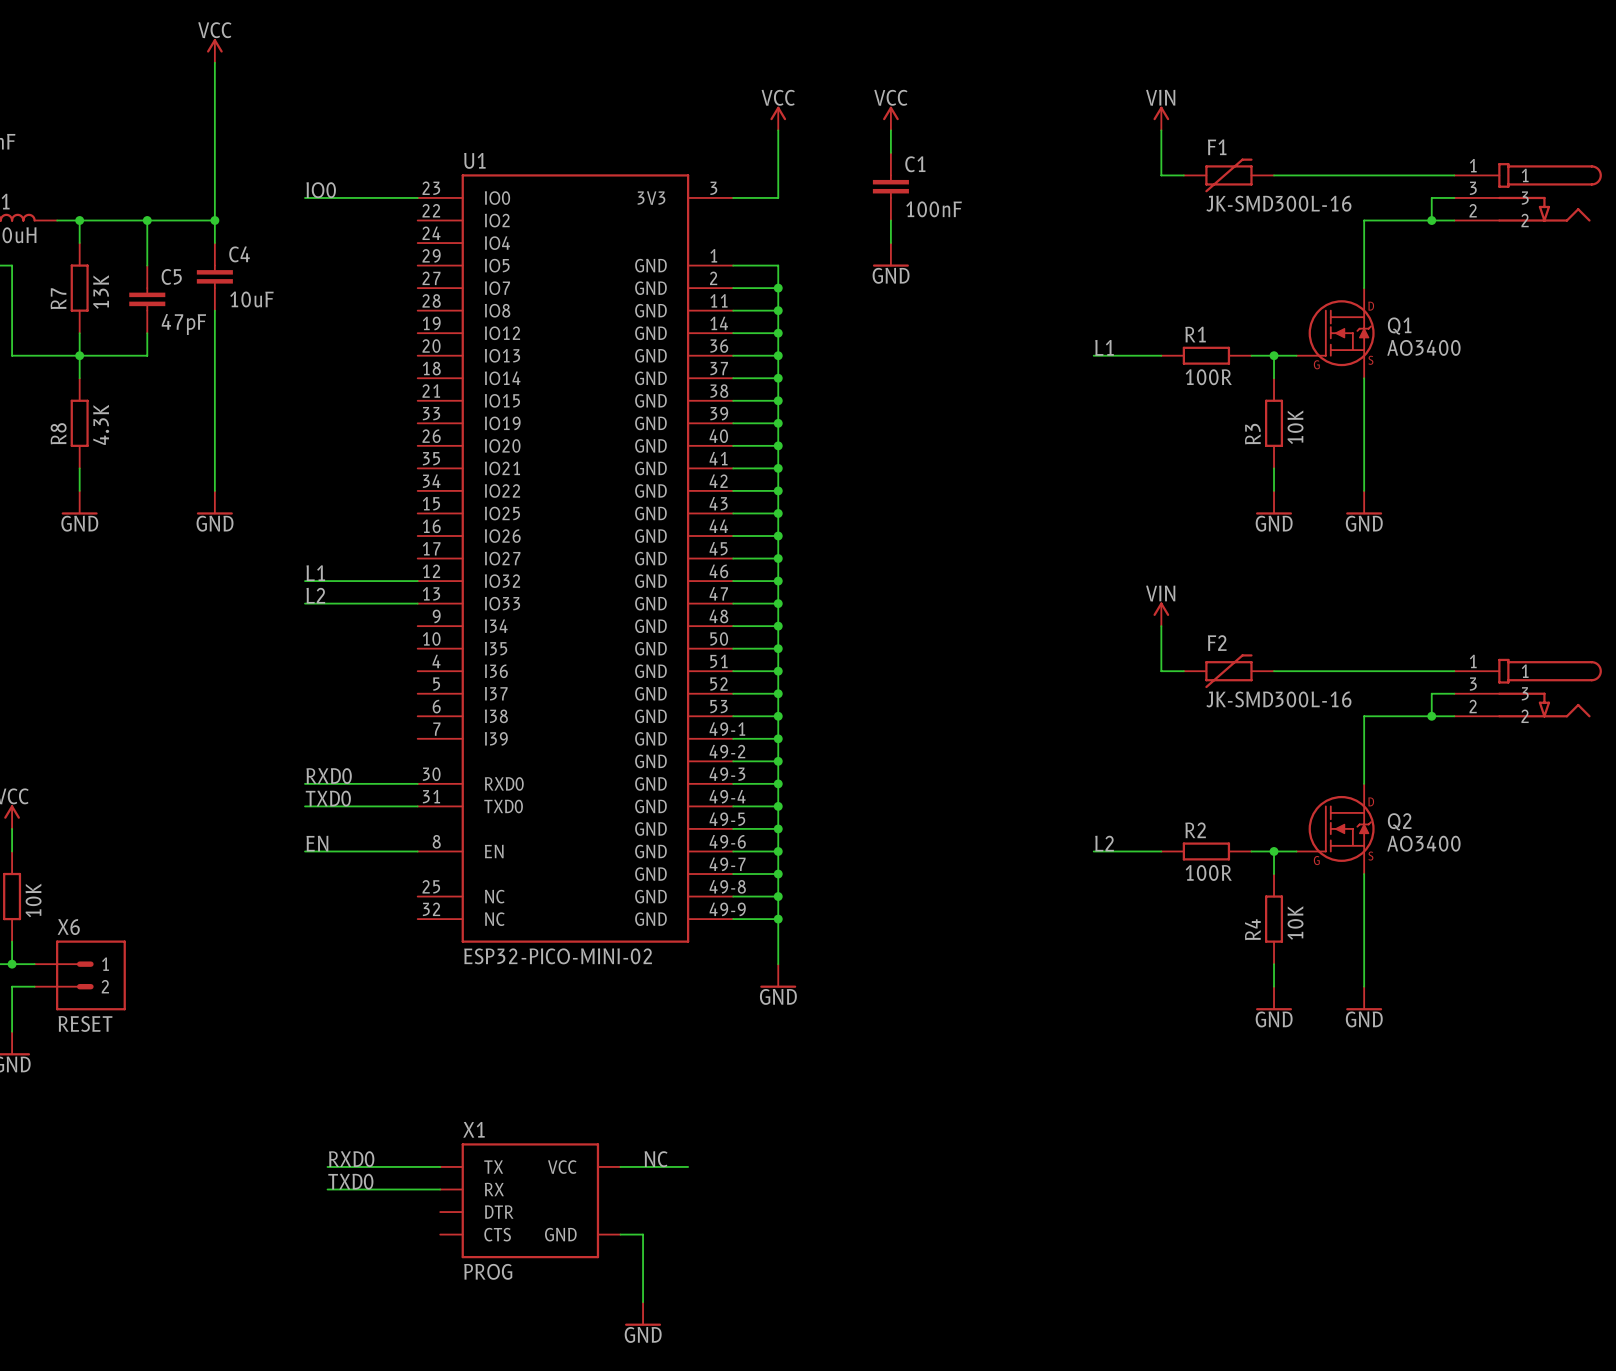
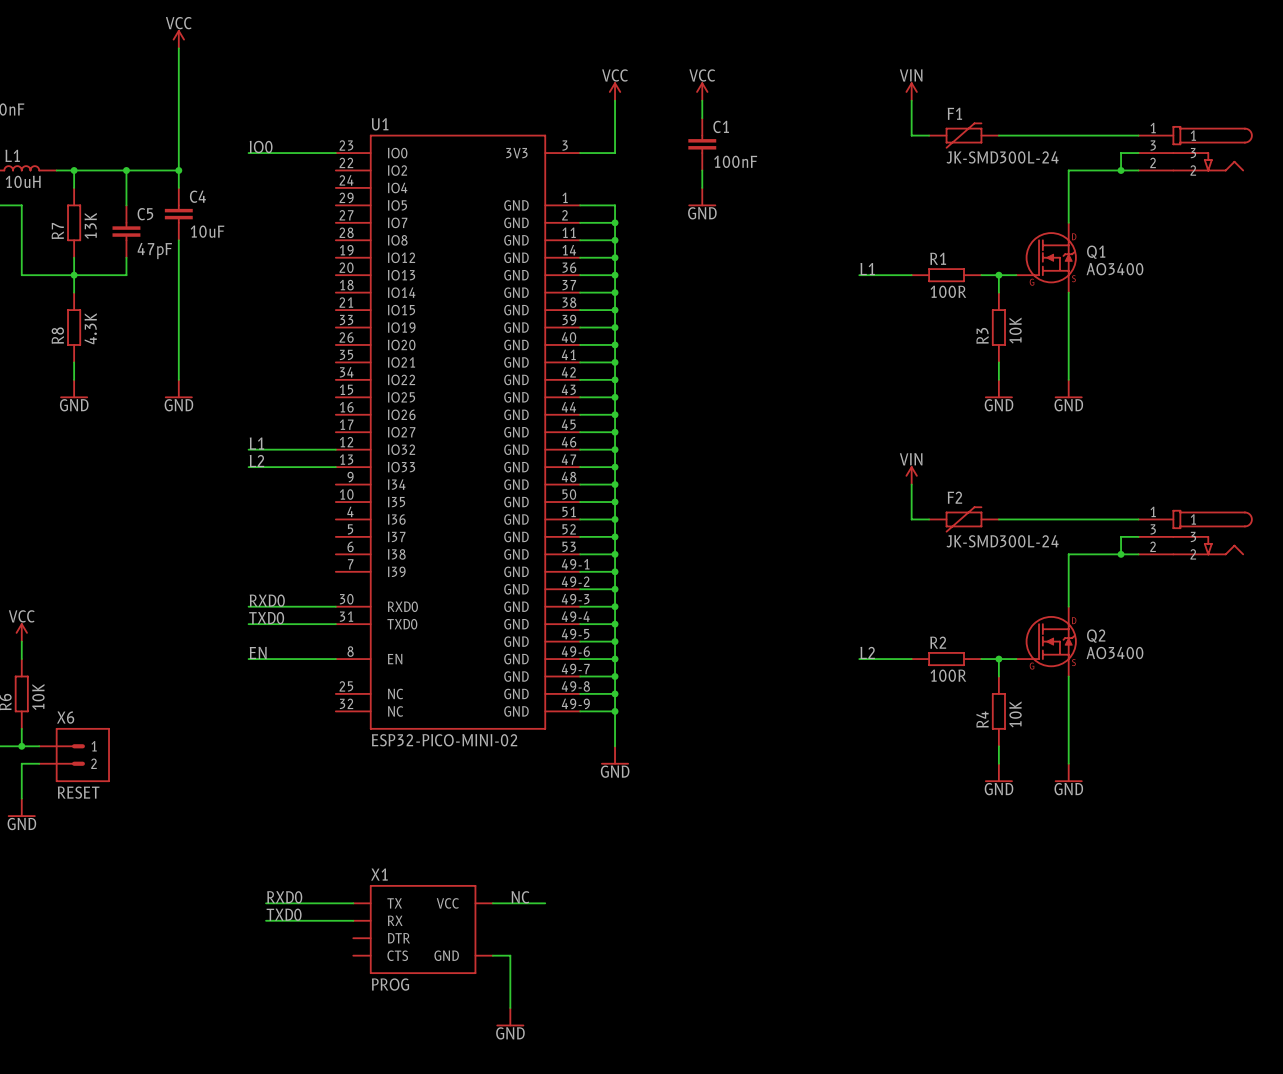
F1 value: JK-SMD300L-16 (1278, 203) -> JK-SMD300L-24 (1002, 157)
F2 value: JK-SMD300L-16 (1278, 699) -> JK-SMD300L-24 (1002, 541)

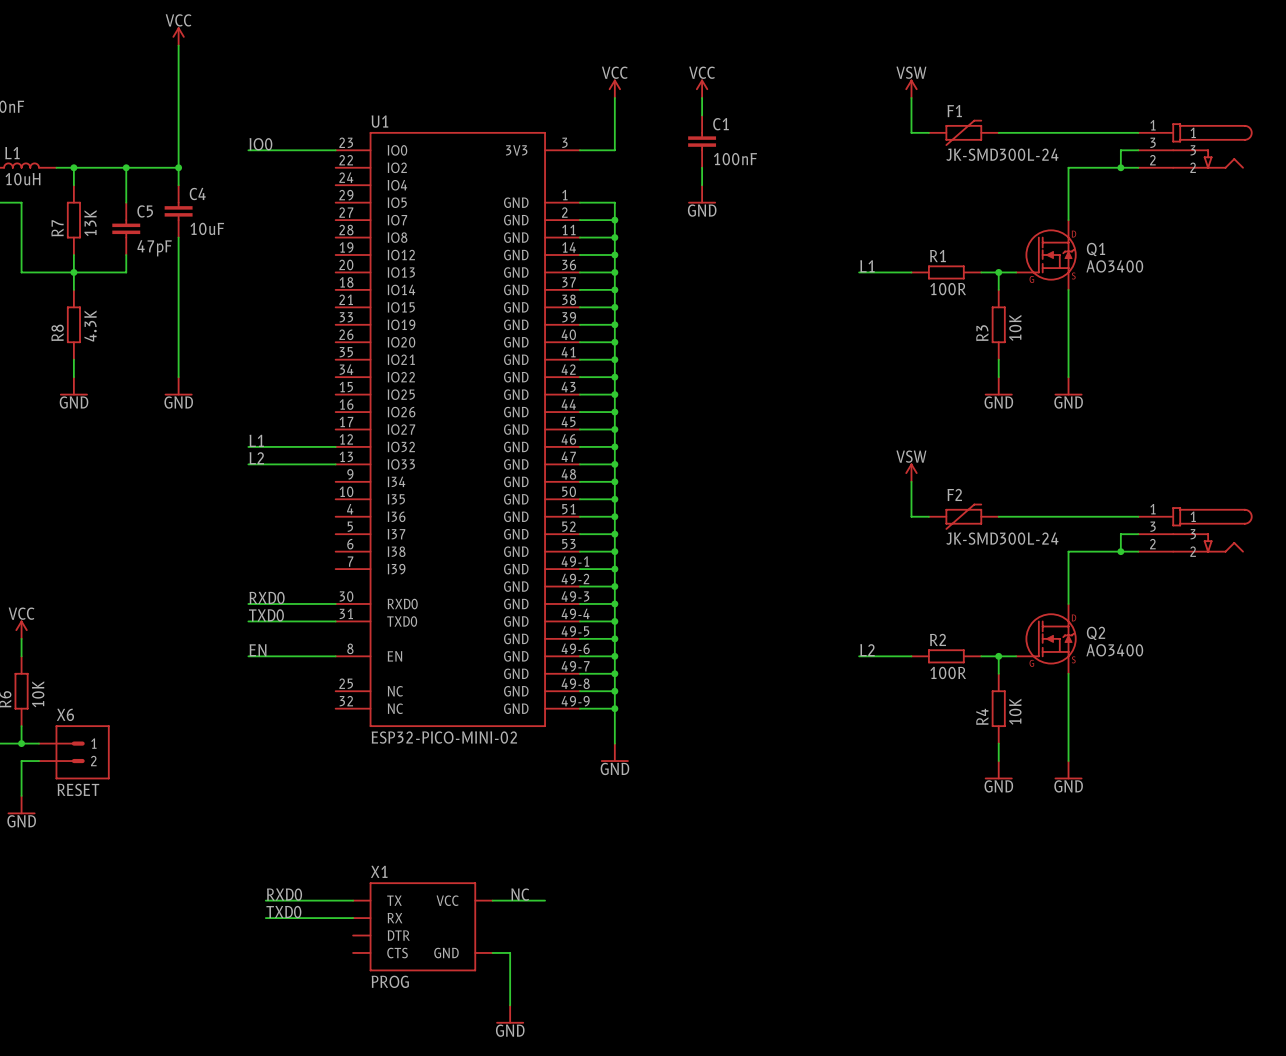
power symbol: VIN (911, 91) -> VSW (911, 88)
power symbol: VIN (911, 475) -> VSW (911, 472)

